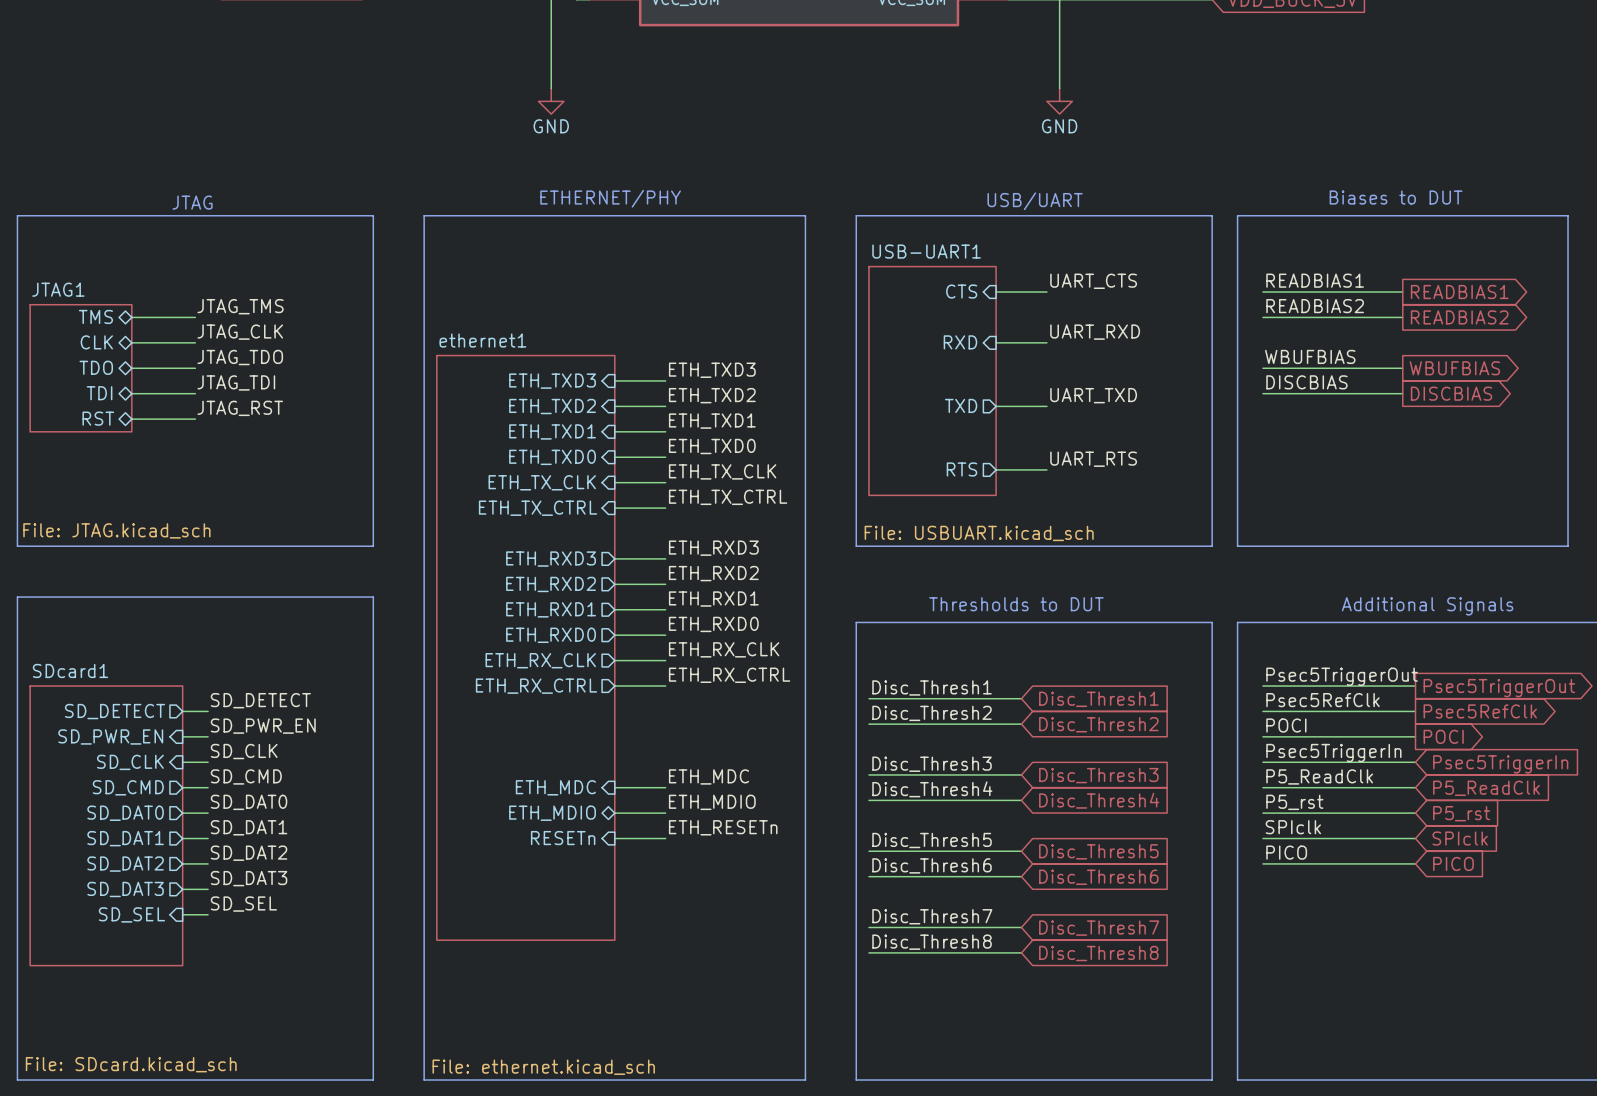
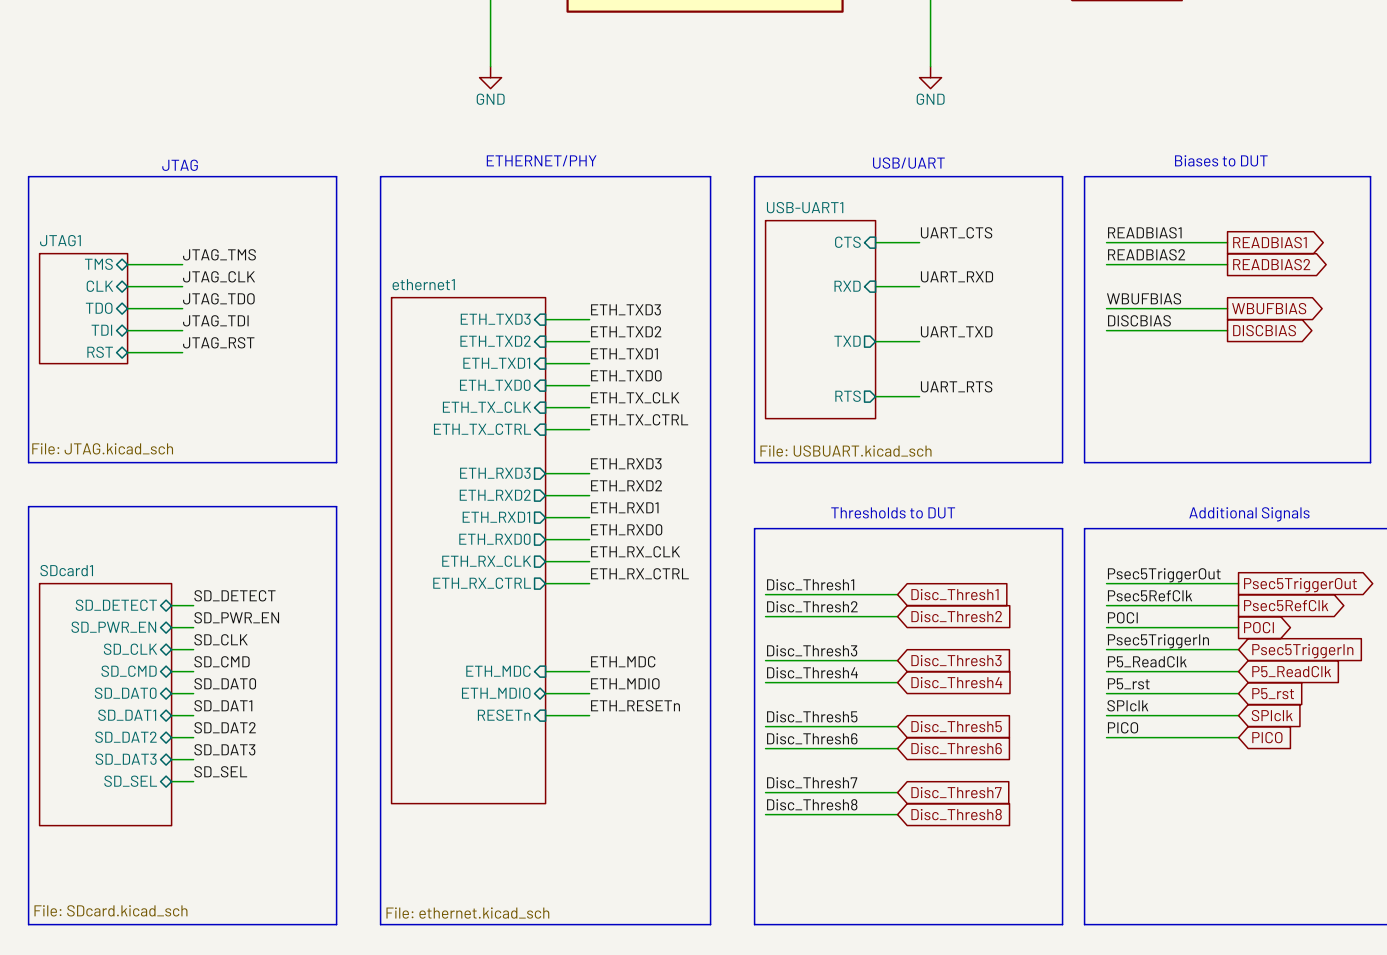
sheet pin shape: output (114, 711) -> bidirectional (116, 605)
sheet pin shape: input (110, 736) -> bidirectional (113, 627)
sheet pin shape: input (130, 762) -> bidirectional (130, 649)
sheet pin shape: output (128, 787) -> bidirectional (129, 671)
sheet pin shape: output (125, 813) -> bidirectional (125, 693)
sheet pin shape: output (125, 838) -> bidirectional (127, 715)
sheet pin shape: output (125, 864) -> bidirectional (126, 737)
sheet pin shape: output (125, 889) -> bidirectional (126, 759)
sheet pin shape: input (131, 914) -> bidirectional (130, 781)

